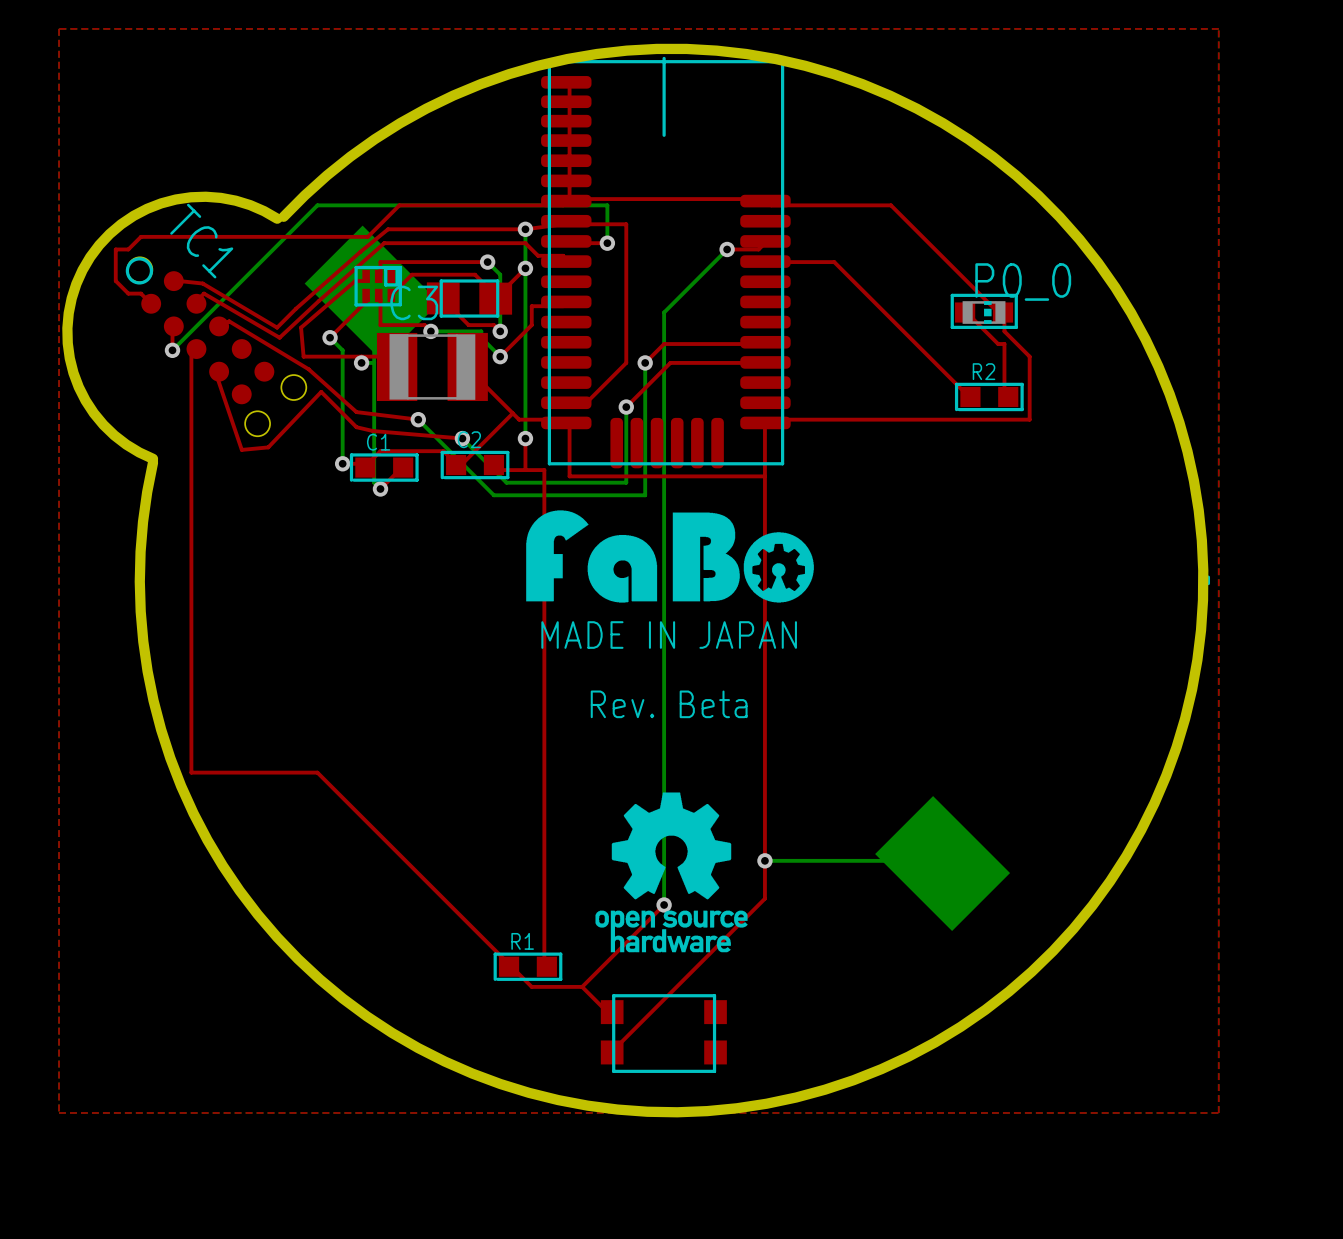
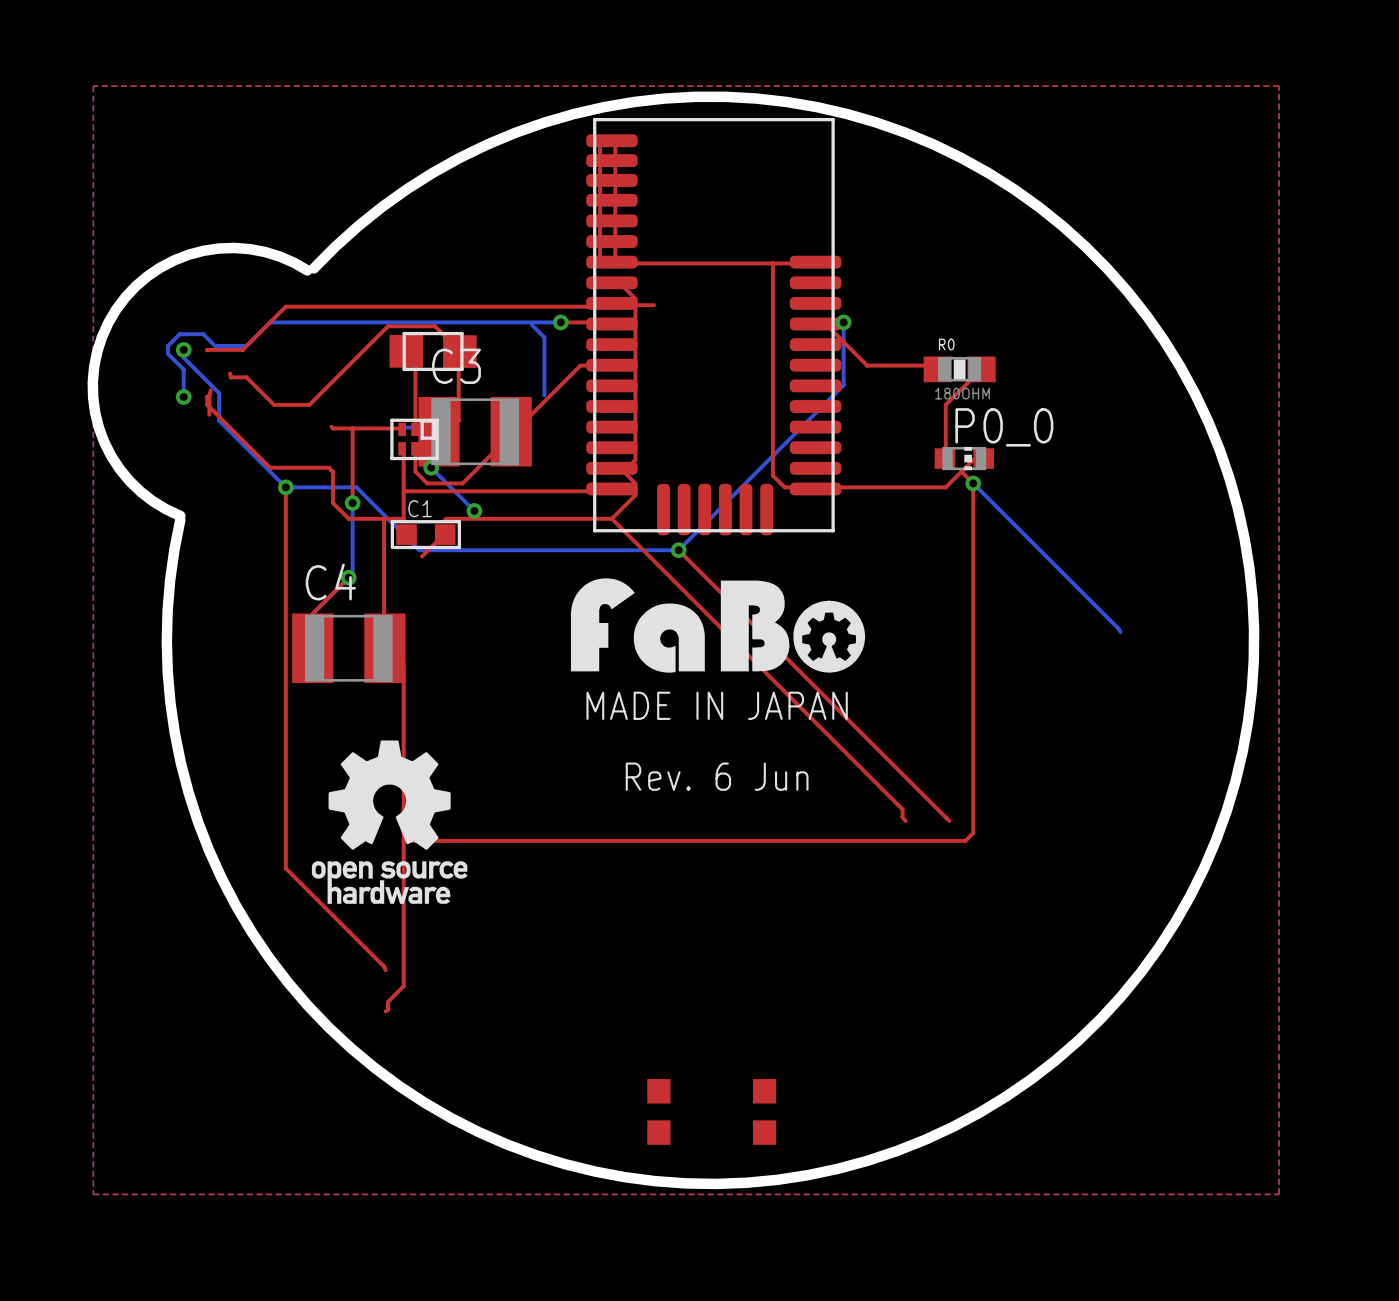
top track: none -> (601, 140) (600, 141) (601, 160) (600, 161) (601, 180) (600, 180) (601, 200) (600, 200) (600, 220) (601, 220) (600, 259) (601, 262) (805, 262)
top track: none -> (772, 263) (772, 475) (784, 487) (804, 487) (805, 488) (808, 487) (945, 487) (973, 459) (983, 458)
board edge: none -> (313, 268) (358, 226) (382, 206) (433, 172) (459, 157) (515, 132) (544, 122) (604, 107) (634, 101) (664, 98) (725, 96) (787, 102) (847, 114) (905, 132) (933, 144) (961, 157) (1014, 189) (1039, 207) (1085, 246) (1127, 291) (1146, 315) (1180, 366) (1208, 421) (1229, 478) (1237, 508) (1249, 568) (1252, 599) (1253, 660) (1248, 721) (1235, 781) (1226, 810) (1216, 839) (1190, 895) (1158, 947) (1121, 996) (1078, 1040) (1055, 1060) (1006, 1096) (979, 1112) (925, 1139) (896, 1151) (867, 1160) (807, 1175) (746, 1182) (716, 1183) (685, 1183) (624, 1177) (564, 1164) (506, 1144) (478, 1132) (424, 1102) (374, 1067) (350, 1048) (307, 1005) (268, 957) (251, 931) (221, 878) (198, 821) (188, 792) (180, 763) (170, 702) (166, 641) (167, 610) (174, 549) (180, 519)
board edge: none -> (307, 270) (279, 256) (249, 249) (218, 248) (188, 254) (160, 267) (136, 286) (116, 309) (108, 322) (97, 351) (92, 382) (95, 413) (99, 428) (111, 456) (129, 481) (153, 501) (180, 515)
top track: none -> (601, 282) (619, 283) (635, 298) (635, 459) (623, 471)
bottom track: (525, 229) (525, 438) -> none
via: (525, 229) -> none
top track: none -> (601, 303) (600, 306) (285, 306) (242, 349) (206, 350)
top track: (765, 241) (758, 249) (727, 249) -> none
bottom track: (607, 243) (607, 205) (317, 205) (172, 350) -> none
via: (607, 243) -> none
bottom track: (727, 249) (664, 312) (664, 904) -> none
via position: (727, 249) -> (843, 322)
top track: none -> (560, 322) (600, 322) (601, 324)
bottom track: none -> (560, 322) (270, 322) (246, 345) (215, 345) (203, 334) (179, 334) (168, 345) (168, 353) (183, 369) (183, 397)
bottom track: none -> (843, 322) (843, 385) (678, 550) (419, 550) (356, 487) (285, 487) (219, 420) (219, 393) (183, 357) (183, 349)
top track: (566, 261) (563, 255) (538, 255) (525, 243) (384, 243) (279, 337) (204, 293) (196, 303) -> none
top track: none -> (805, 324) (808, 326) (827, 326) (867, 365) (933, 365) (937, 369)
top track: (765, 261) (834, 262) (970, 396) -> none
top track: (487, 262) (380, 262) (380, 274) (378, 276) -> none
via: (487, 262) -> none
part footprint: [354, 265, 403, 307] -> [389, 331, 477, 372]
top track: (525, 268) (495, 298) (493, 293) (475, 274) (412, 274) (391, 295) -> none
via position: (525, 268) -> (560, 322)
top track: (366, 276) (367, 281) (355, 281) (301, 327) (303, 356) (386, 356) (397, 366) -> none
top track: (173, 281) (202, 283) (277, 327) (296, 308) (388, 229) (525, 229) (563, 224) (566, 221) (569, 224) (626, 224) (626, 362) (588, 400) (569, 400) (566, 402) -> none
via: none -> (183, 349)
top track: none -> (406, 351) (415, 361) (415, 429)
bottom track: (372, 293) (374, 293) (374, 482) (380, 488) -> none
top track: (366, 295) (367, 299) (330, 337) -> none
top track: (378, 295) (380, 325) (424, 325) (430, 331) -> none
top track: (443, 298) (468, 325) (493, 325) (500, 331) -> none
part: (469, 298) -> none
top track: none -> (601, 365) (580, 365) (462, 483) (427, 483) (415, 471) (415, 448)
top track: (566, 301) (563, 306) (531, 306) (531, 325) (500, 356) -> none
top track: (151, 303) (140, 293) (128, 293) (115, 281) (115, 249) (128, 249) (140, 236) (367, 236) (399, 205) (563, 205) (569, 199) (764, 199) (771, 205) (891, 205) (998, 312) (1004, 312) (1004, 331) (1029, 356) (1029, 419) (771, 419) (765, 422) (764, 898) (612, 1052) -> none
R0: none -> 180OHM (959, 369)
top track: none -> (981, 369) (945, 404) (944, 458)
top track: none -> (230, 373) (230, 377) (246, 377) (274, 404) (309, 404) (387, 326) (435, 326) (459, 351) (458, 420) (431, 448) (427, 448) (431, 452) (431, 467)
top track: (965, 312) (998, 344) (1004, 344) (1004, 394) (1008, 396) -> none
P0_0 position: (984, 312) -> (964, 458)
top track: (219, 326) (229, 321) (308, 369) (356, 412) (418, 419) -> none
bottom track: (430, 331) (481, 331) (481, 337) (500, 356) -> none
via: (430, 331) -> none
via: (500, 331) -> none
top track: none -> (206, 396) (207, 404) (270, 467) (329, 467) (332, 471) (332, 503) (348, 518) (403, 518) (402, 448)
bottom track: (330, 337) (342, 350) (342, 463) -> none
via: (330, 337) -> none
top track: (765, 342) (764, 344) (664, 344) (645, 362) -> none
TC1: (216, 346) -> none
top track: (196, 349) (191, 350) (191, 772) (317, 772) (506, 961) (509, 966) (512, 968) (531, 986) (582, 986) -> none
via position: (172, 350) -> (183, 397)
via: (500, 356) -> none
top track: none -> (331, 426) (332, 428) (402, 429)
via: (361, 362) -> none
bottom track: (645, 362) (645, 495) (493, 495) (418, 419) -> none
via: (645, 362) -> none
top track: (765, 362) (670, 362) (626, 407) -> none
top track: none -> (352, 428) (352, 503)
top track: (467, 366) (519, 419) (563, 419) (569, 425) (569, 476) (764, 476) -> none
top track: (219, 371) (216, 375) (241, 449) (268, 447) (321, 391) (356, 427) (372, 431) (462, 438) -> none
part: none -> (414, 439)
R2: (989, 396) -> none
bottom track: none -> (431, 467) (474, 510)
via: none -> (431, 467)
top track: none -> (623, 471) (635, 483) (635, 495) (611, 518)
top track: none -> (961, 471) (973, 483) (973, 833) (965, 840) (403, 840)
bottom track: (626, 407) (626, 482) (506, 482) (462, 438) -> none
via: (626, 407) -> none
top track: (512, 413) (462, 463) (456, 463) -> none
bottom track: none -> (973, 483) (1120, 632)
via: none -> (973, 483)
via: (418, 419) -> none
top track: none -> (285, 487) (285, 868) (385, 970)
via: none -> (285, 487)
top track: none -> (601, 488) (600, 491) (403, 491)
bottom track: none -> (352, 503) (352, 573) (295, 632)
via: none -> (352, 503)
via: (462, 438) -> none
top track: (525, 438) (525, 470) -> none
via: (525, 438) -> none
via: none -> (474, 510)
top track: none -> (384, 518) (384, 644) (384, 648) (387, 648) (403, 664) (403, 986) (387, 1001) (387, 1009) (385, 1011)
top track: none -> (611, 518) (444, 519)
top track: none -> (611, 518) (902, 809) (902, 817) (905, 820)
top track: (342, 463) (361, 463) (365, 467) (380, 451) (443, 451) (456, 463) -> none
via: (342, 463) -> none
C2: (475, 465) -> none
top track: (493, 465) (493, 470) (544, 470) (544, 961) (546, 966) -> none
top track: none -> (678, 550) (949, 820)
via: none -> (678, 550)
via: (380, 488) -> none
top track: none -> (348, 577) (313, 613) (312, 648)
via: none -> (348, 577)
C4: none -> (348, 648)
part: (636, 580) -> none
text: Rev. Beta (669, 704) -> Rev. 6 Jun (717, 776)
bottom track: (764, 860) (941, 860) (942, 863) -> none
via: (764, 860) -> none
drawing position: (671, 872) -> (389, 822)
top track: (664, 904) (582, 986) -> none
via: (664, 904) -> none
R1: (527, 966) -> none
top track: (582, 986) (607, 1012) (612, 1012) -> none

